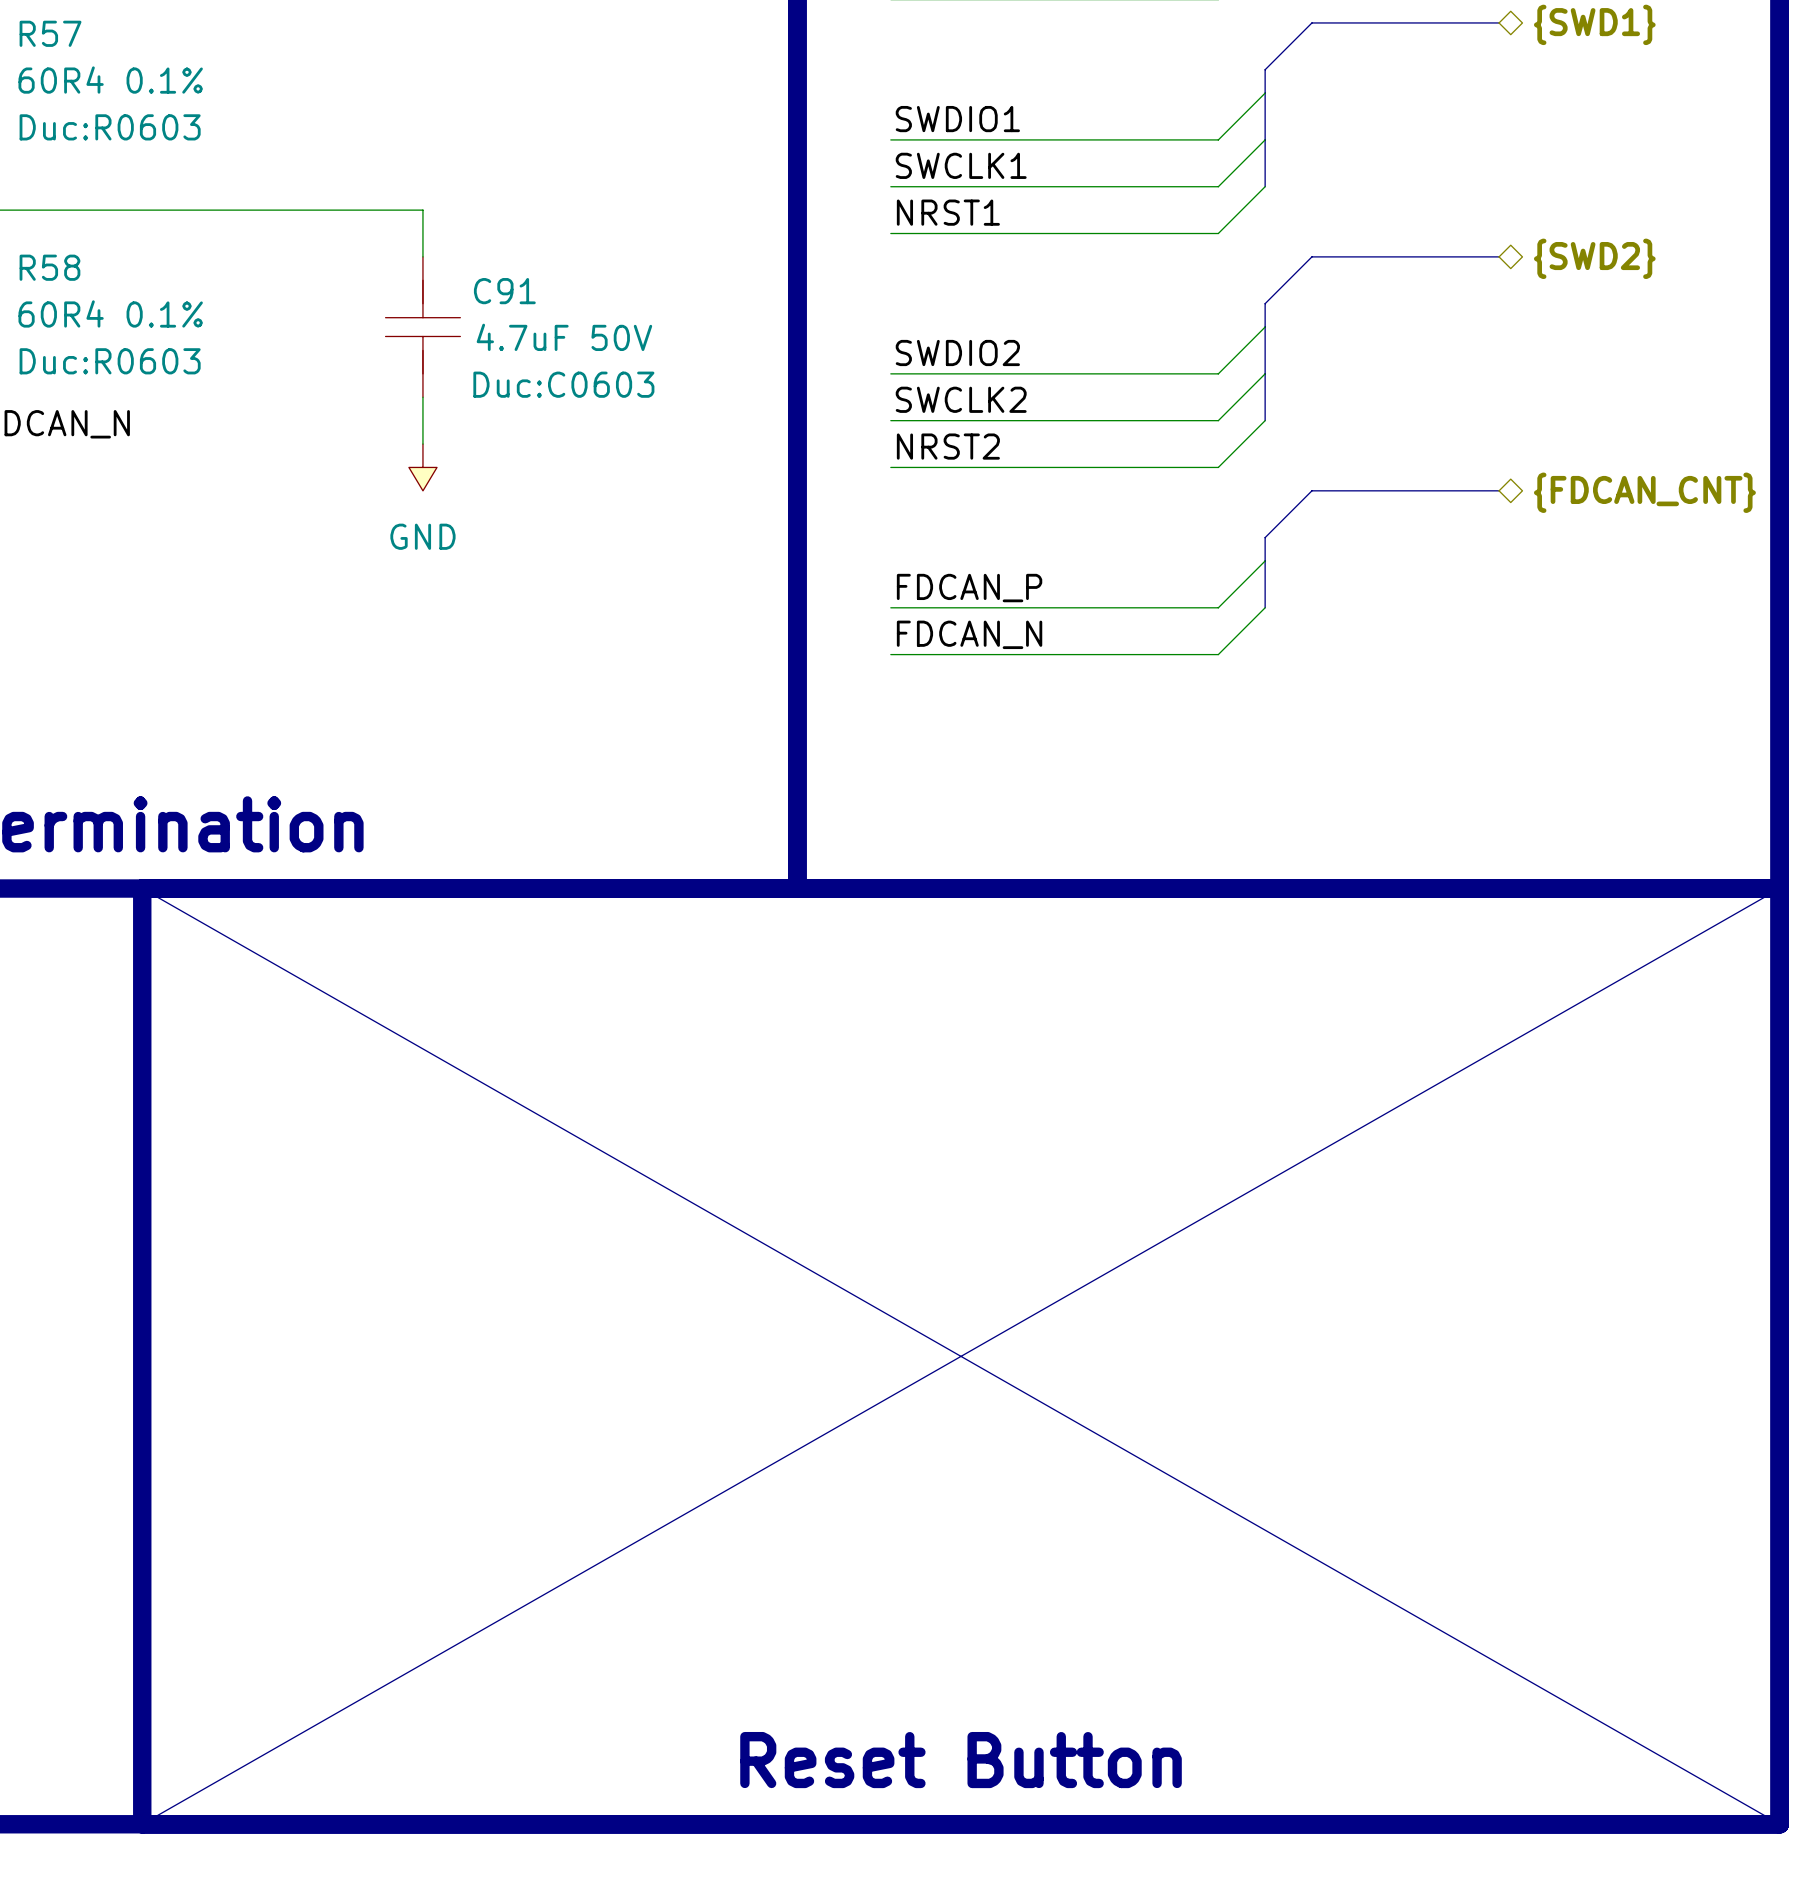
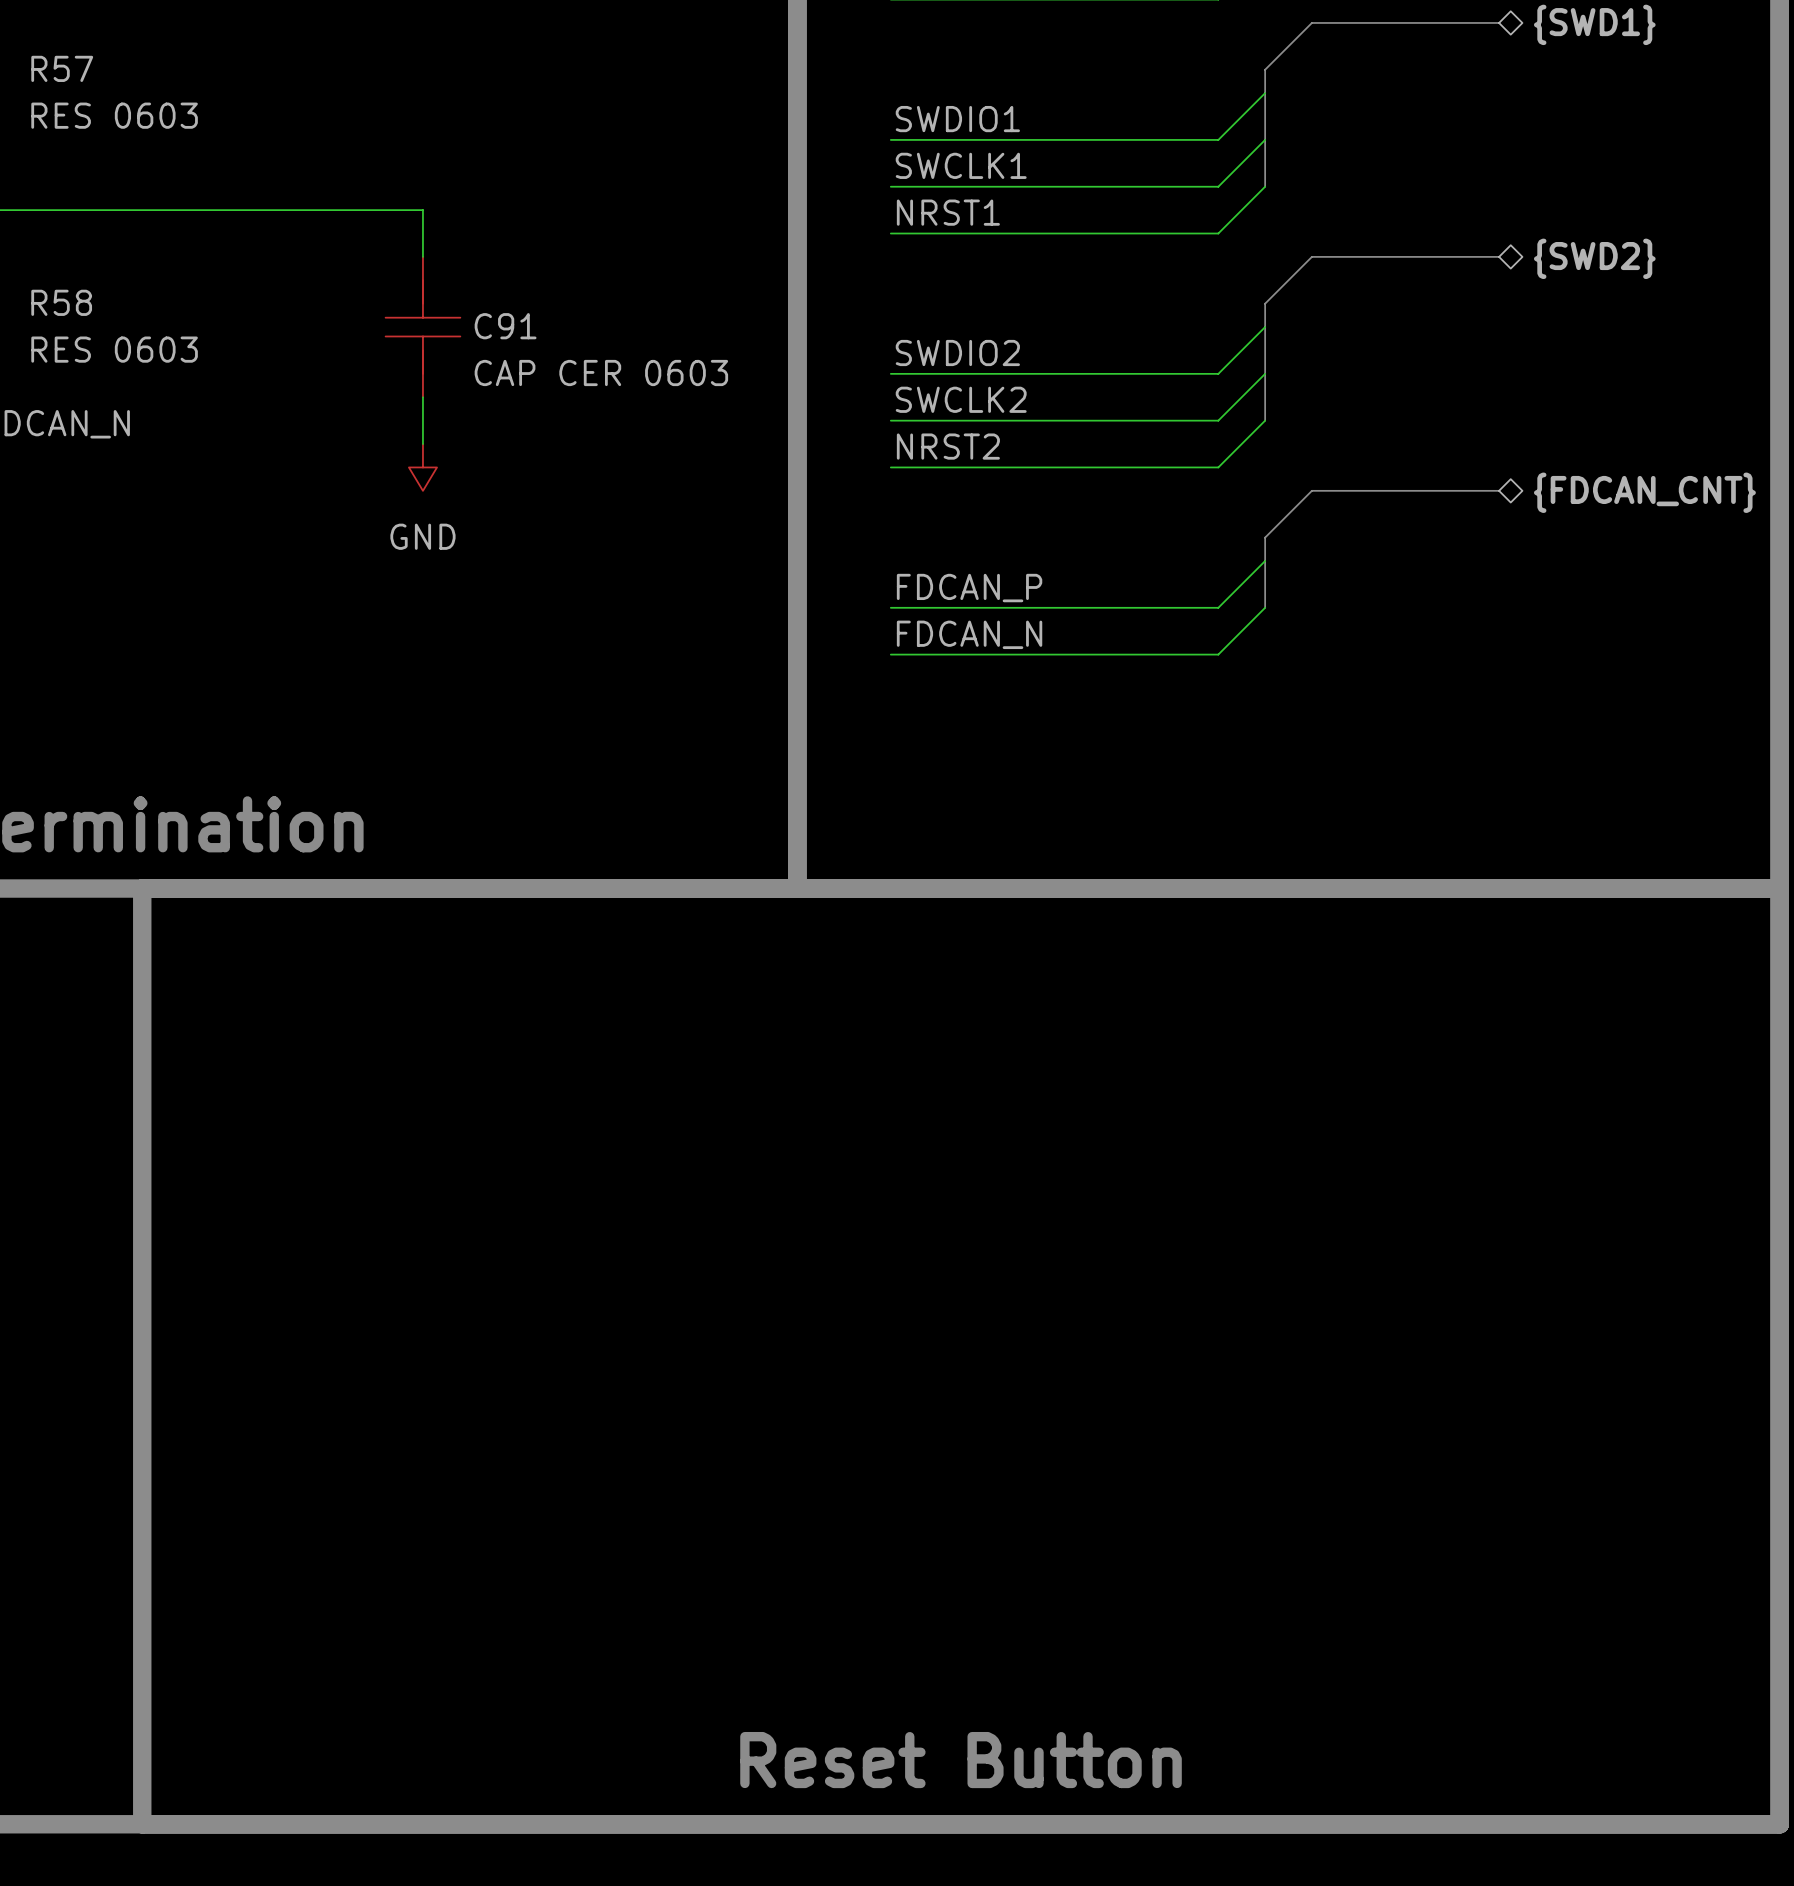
R57 name position: R57 (50, 33) -> R57 (62, 68)
R57 value: 60R4 0.1% (110, 80) -> RES 0603 (114, 115)
R57 text: Duc:R0603 (110, 127) -> none
R58 name position: R58 (49, 267) -> R58 (61, 302)
C91 name position: C91 (504, 291) -> C91 (505, 326)
R58 value: 60R4 0.1% (110, 313) -> RES 0603 (114, 349)
C91 value: 4.7uF 50V (564, 337) -> CAP CER 0603 (601, 372)
R58 text: Duc:R0603 (110, 361) -> none
C91 text: Duc:C0603 (563, 384) -> none
line: (142, 888) (1779, 1824) -> none
line: (1779, 888) (142, 1824) -> none

